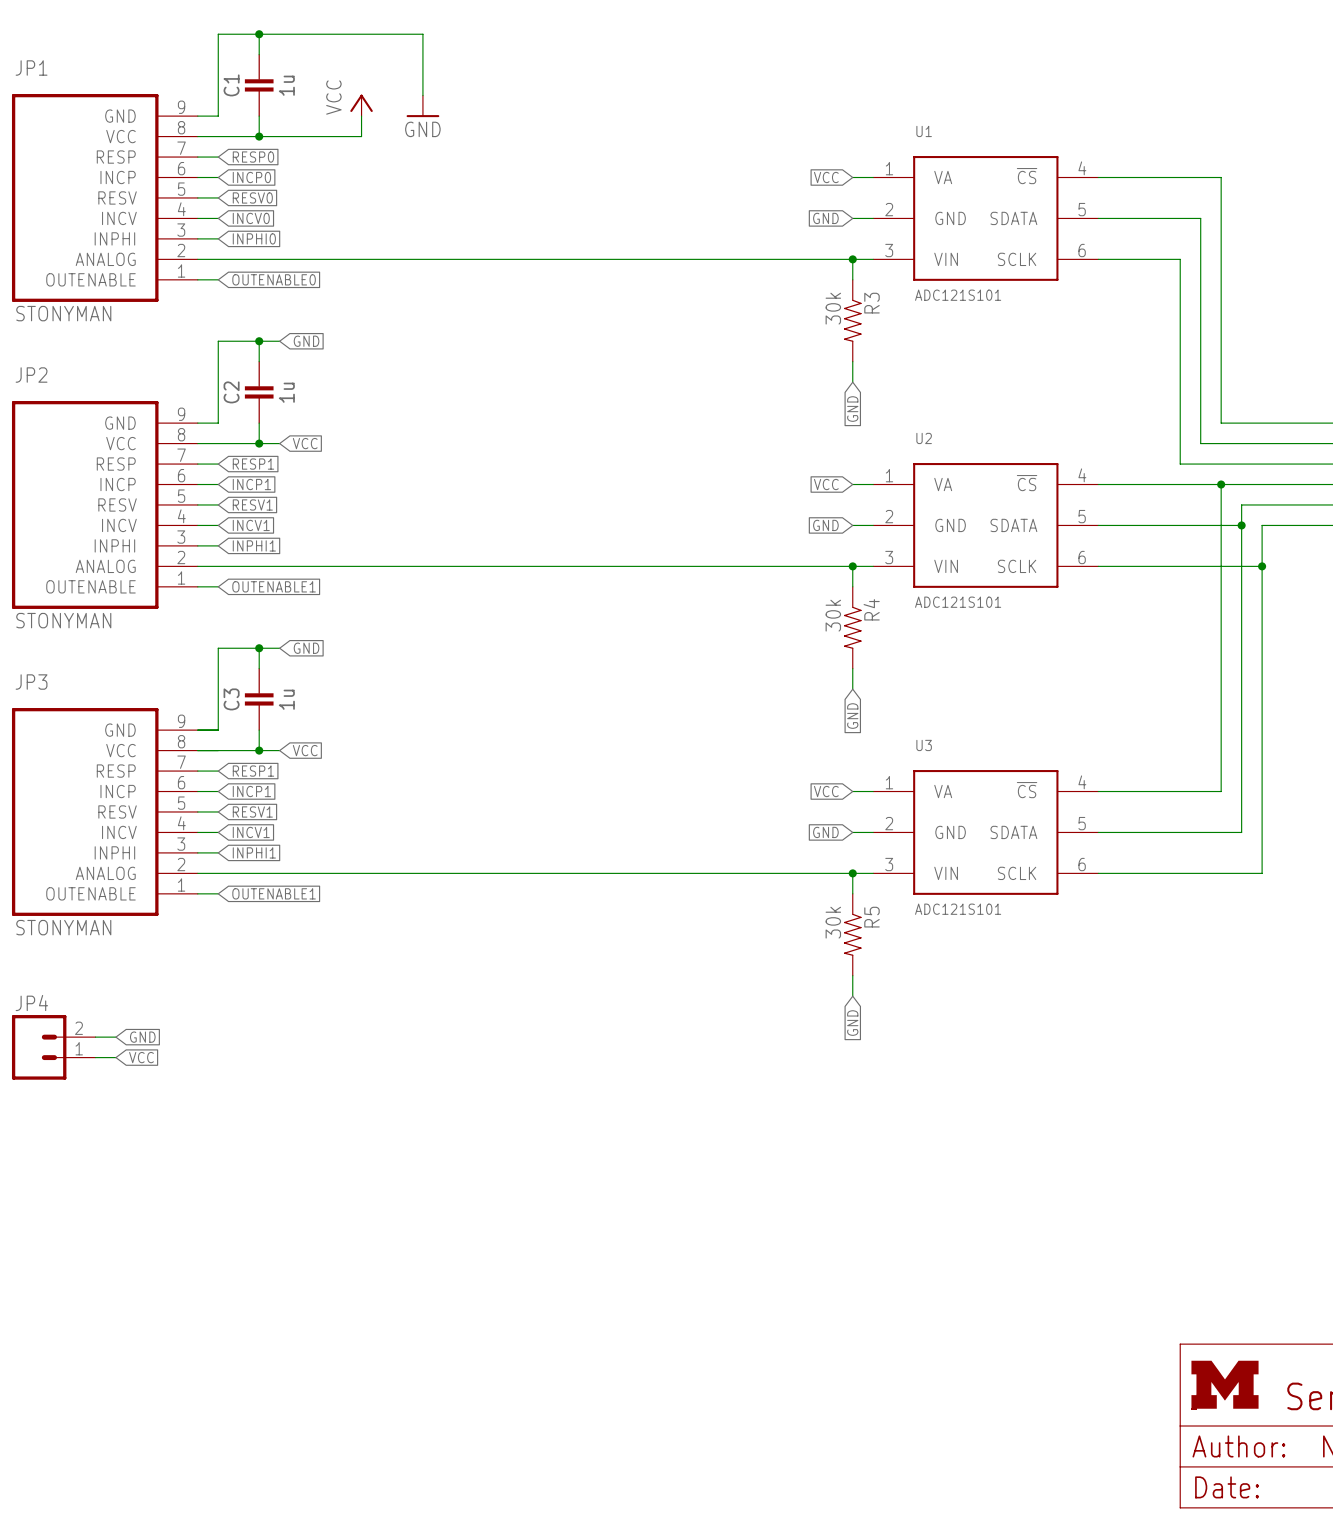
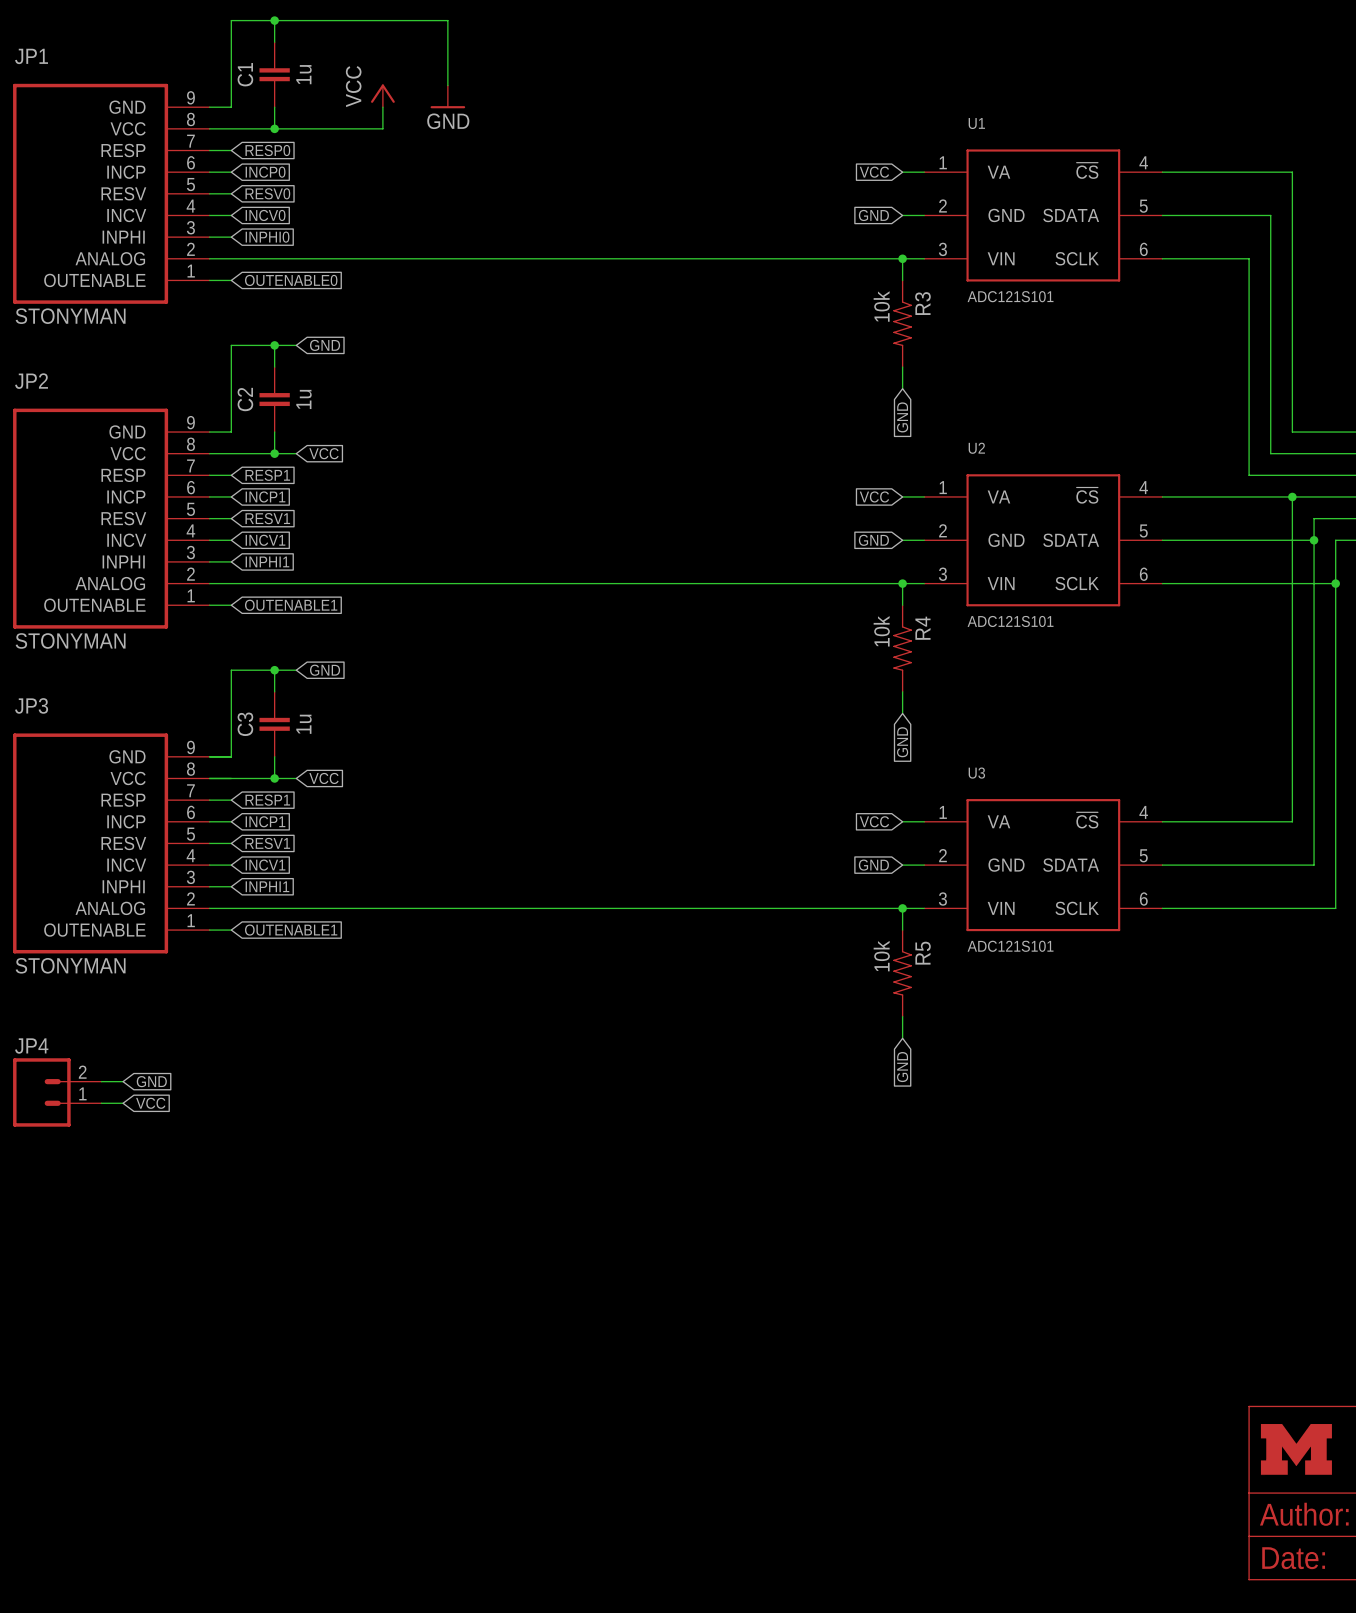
R3 value: 30k (833, 308) -> 10k (881, 306)
R4 value: 30k (833, 615) -> 10k (881, 631)
R5 value: 30k (833, 922) -> 10k (881, 956)

